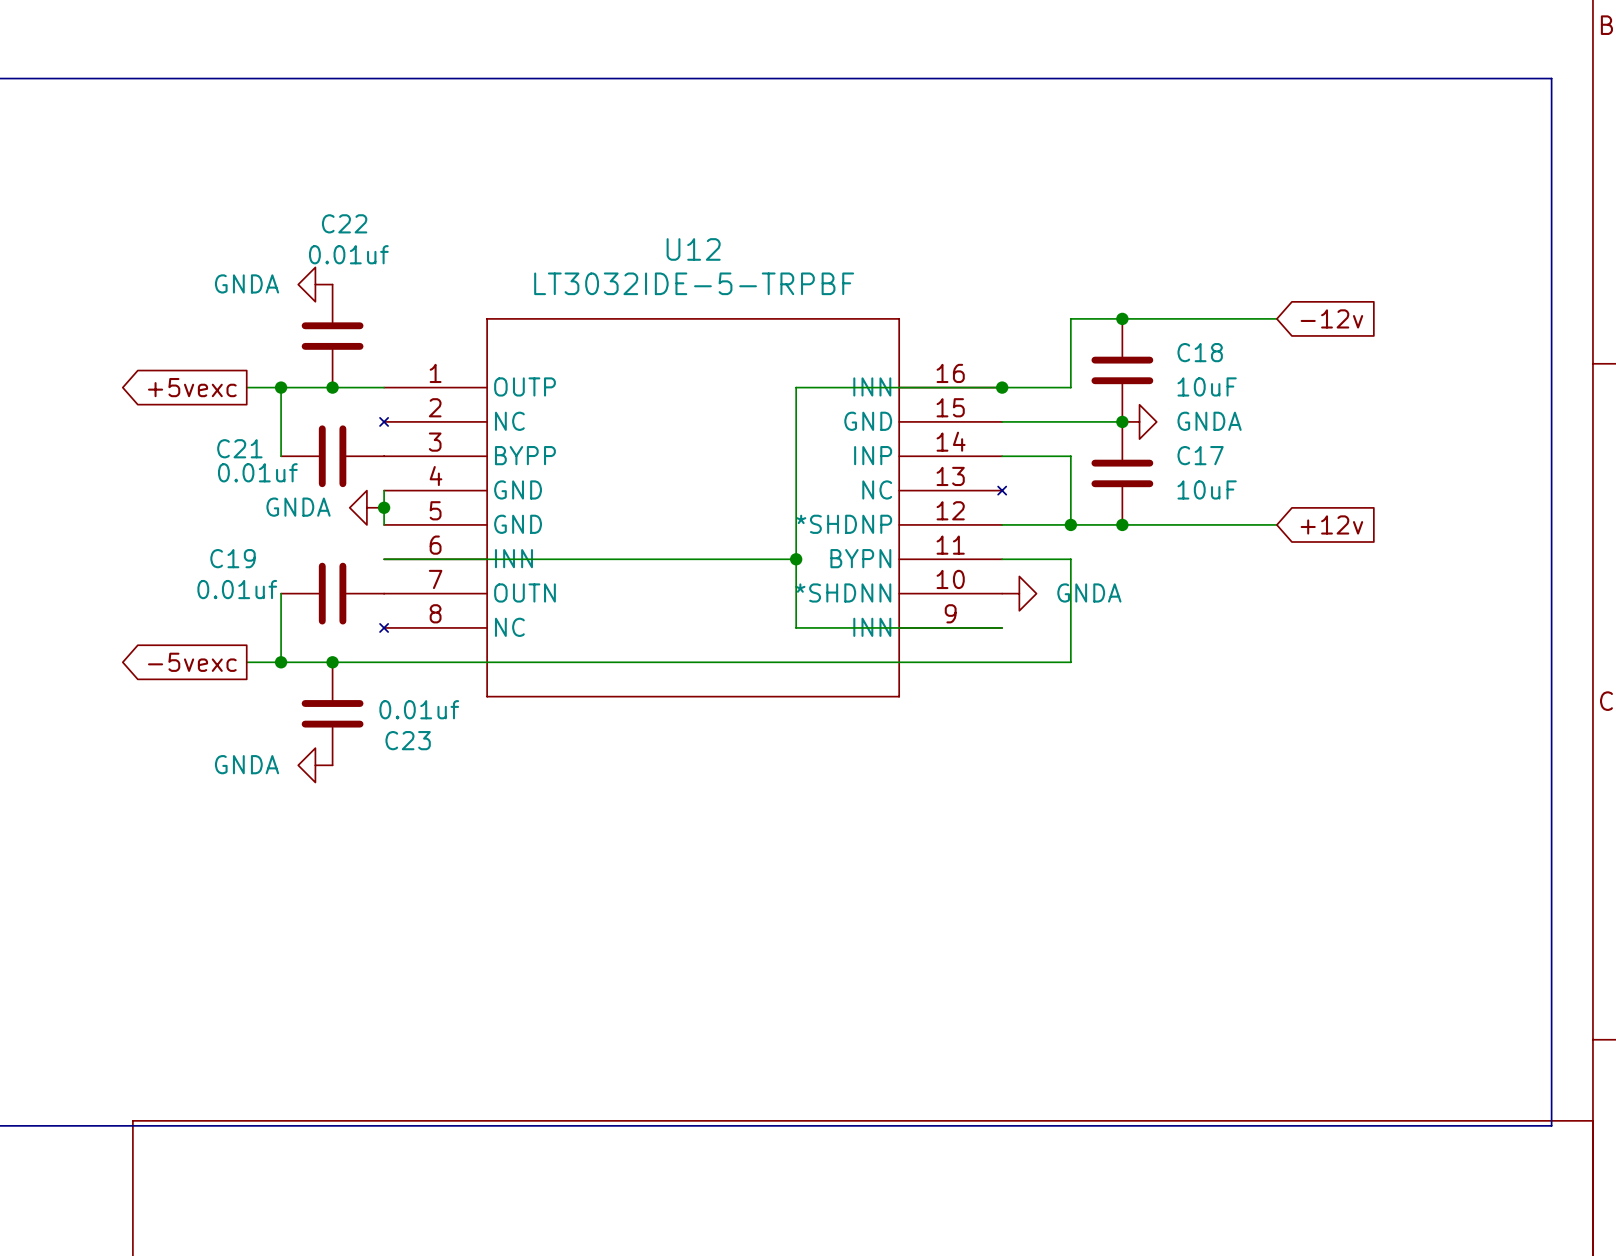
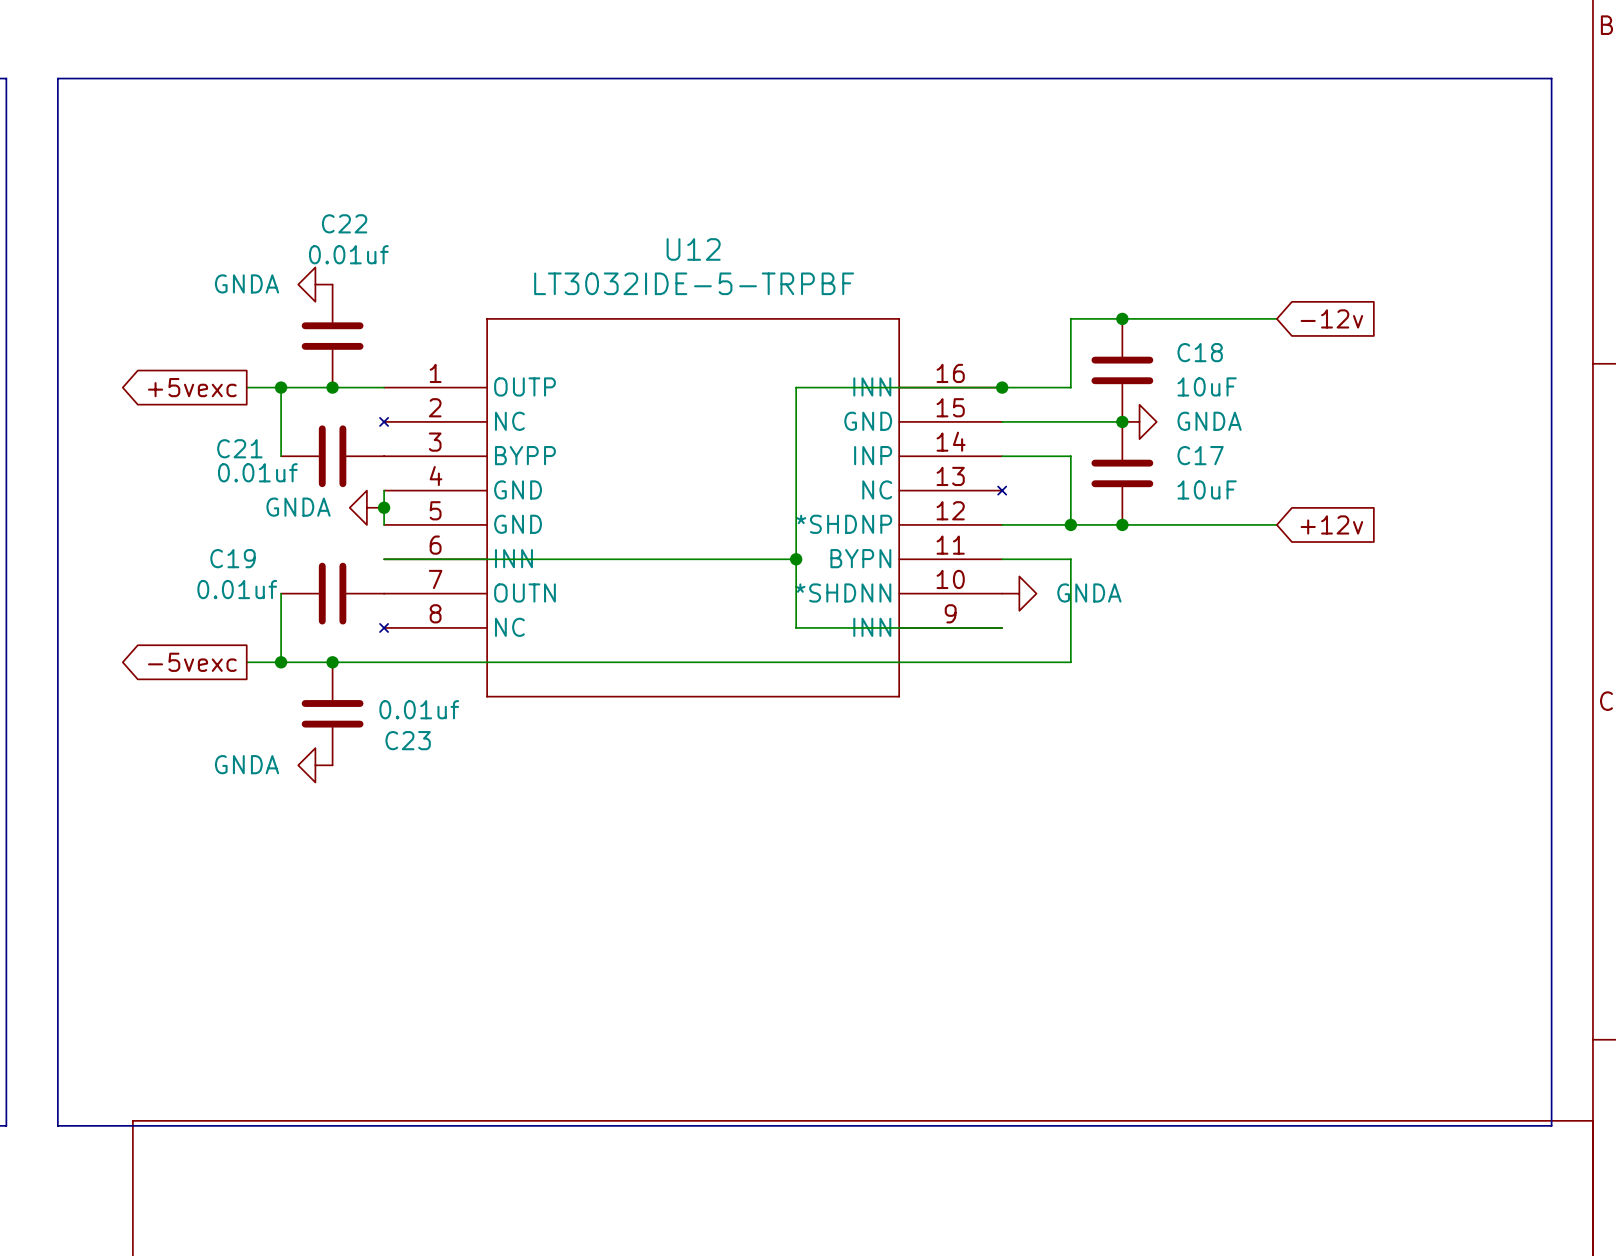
line: (6, 78) (57, 78) -> (6, 78) (6, 1125)
line: (6, 1125) (57, 1125) -> (57, 78) (57, 1125)

